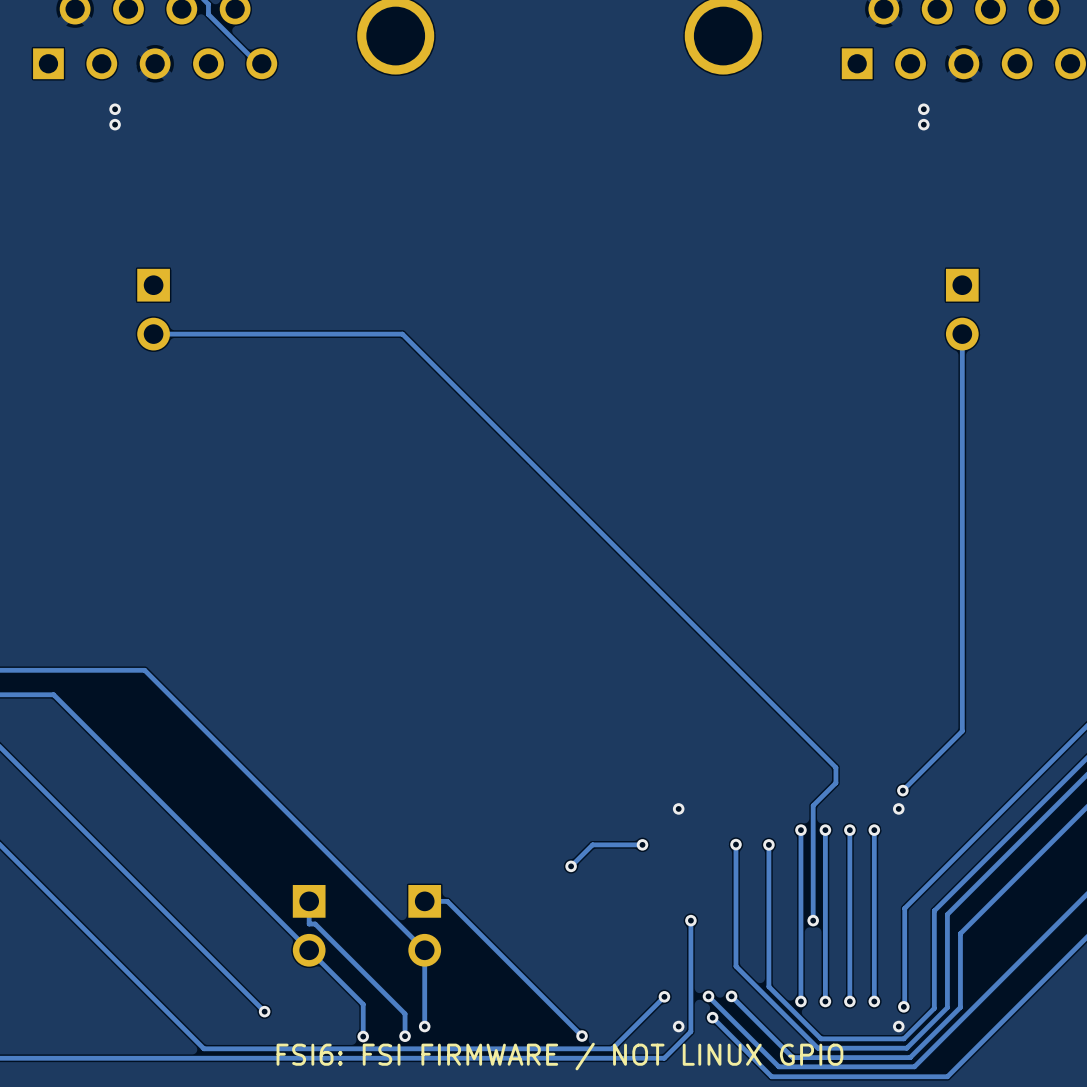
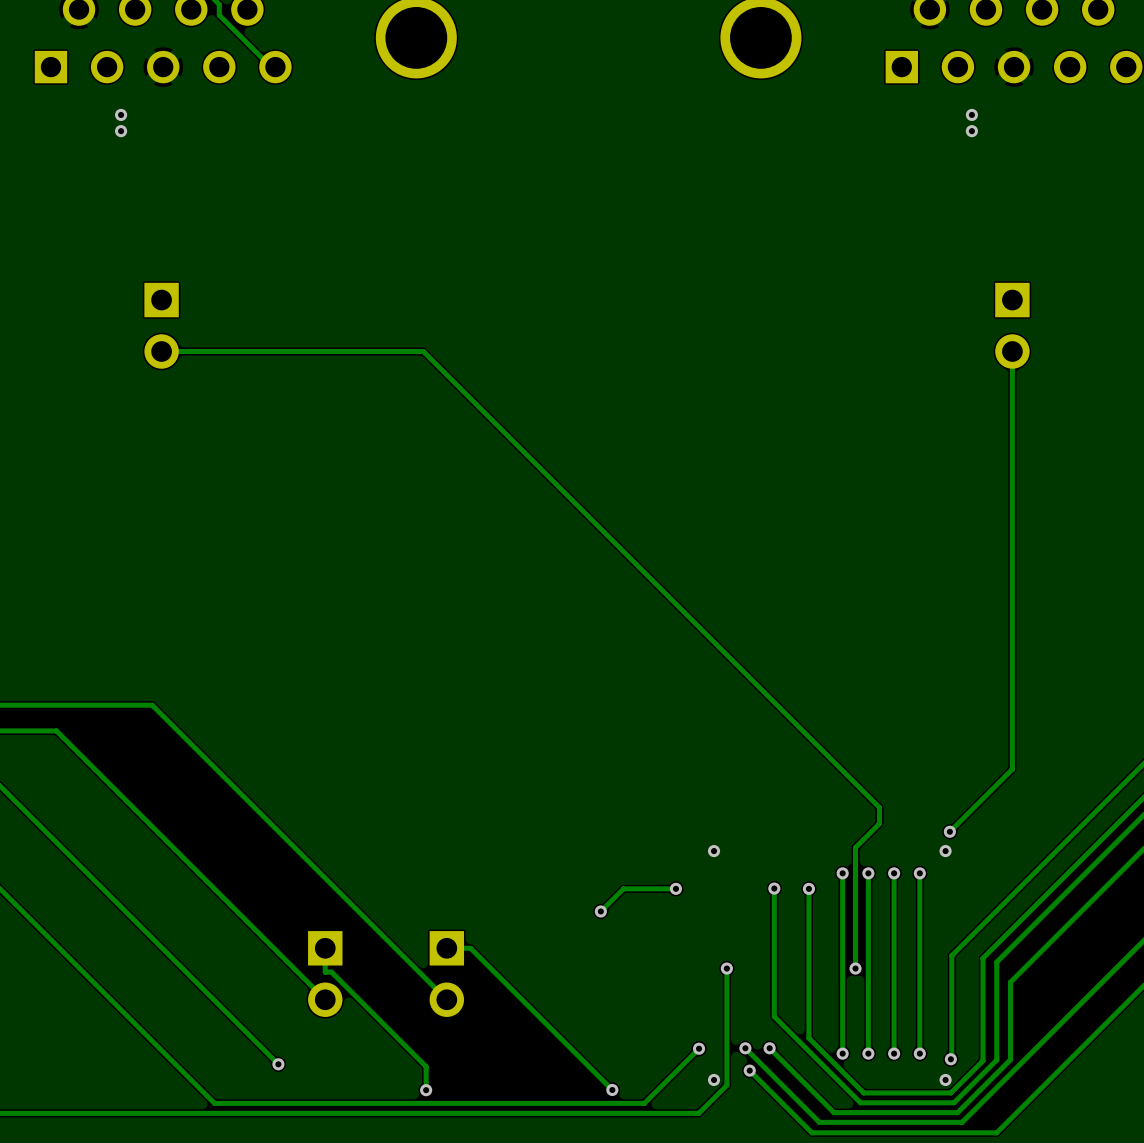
track: (309, 950) (363, 1004) (363, 1036) -> none
track: (424, 950) (424, 1026) -> none
via: (424, 1026) -> none
via: (363, 1036) -> none
text: FSI6: FSI FIRMWARE / NOT LINUX GPIO (559, 1056) -> none

